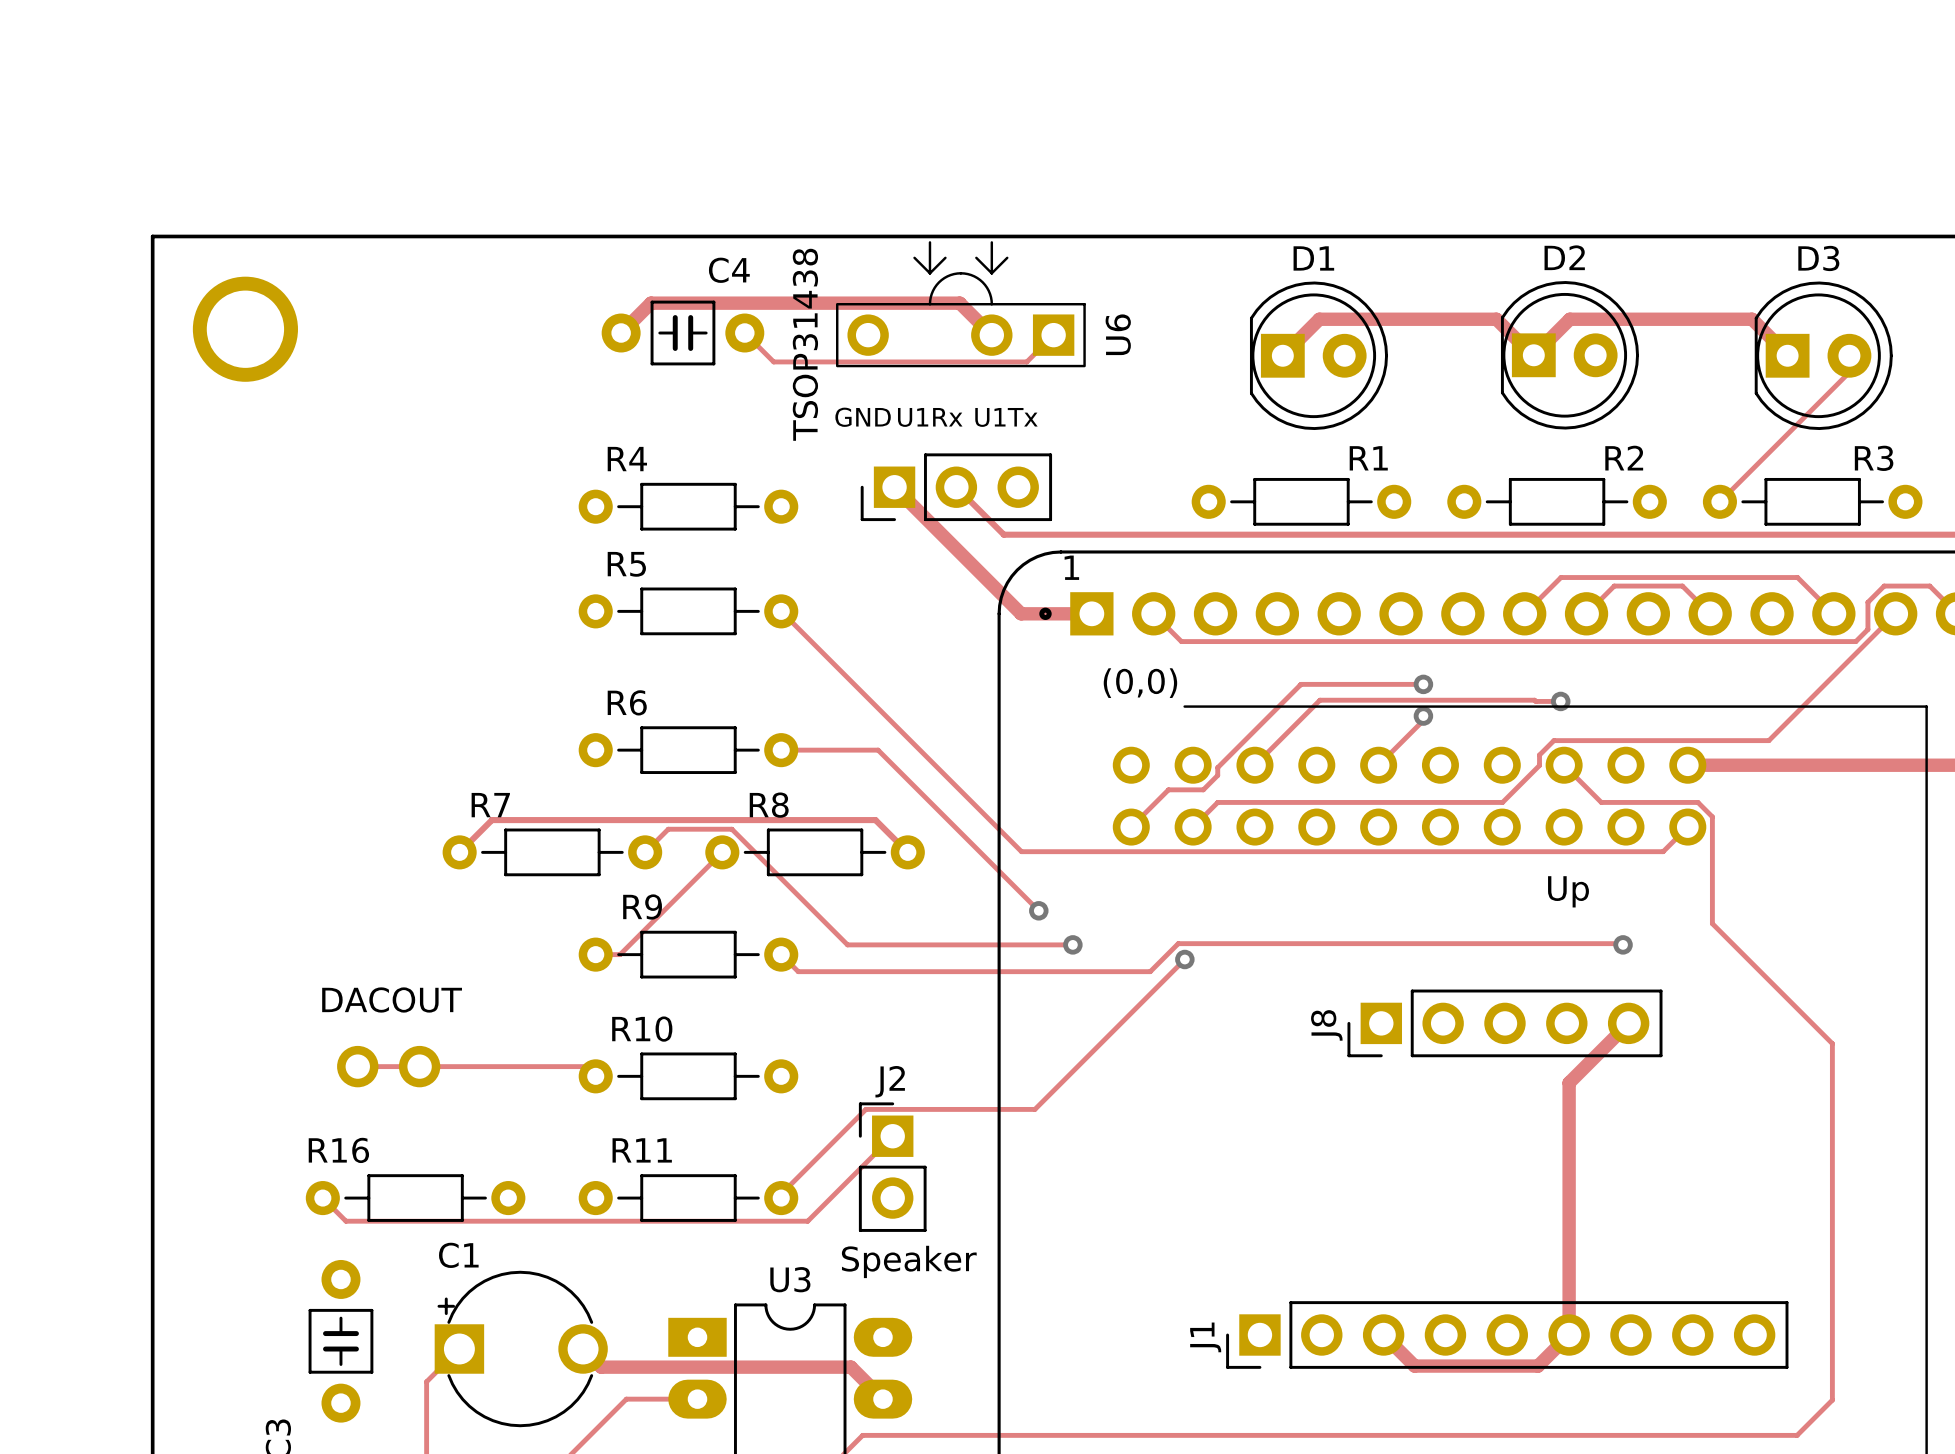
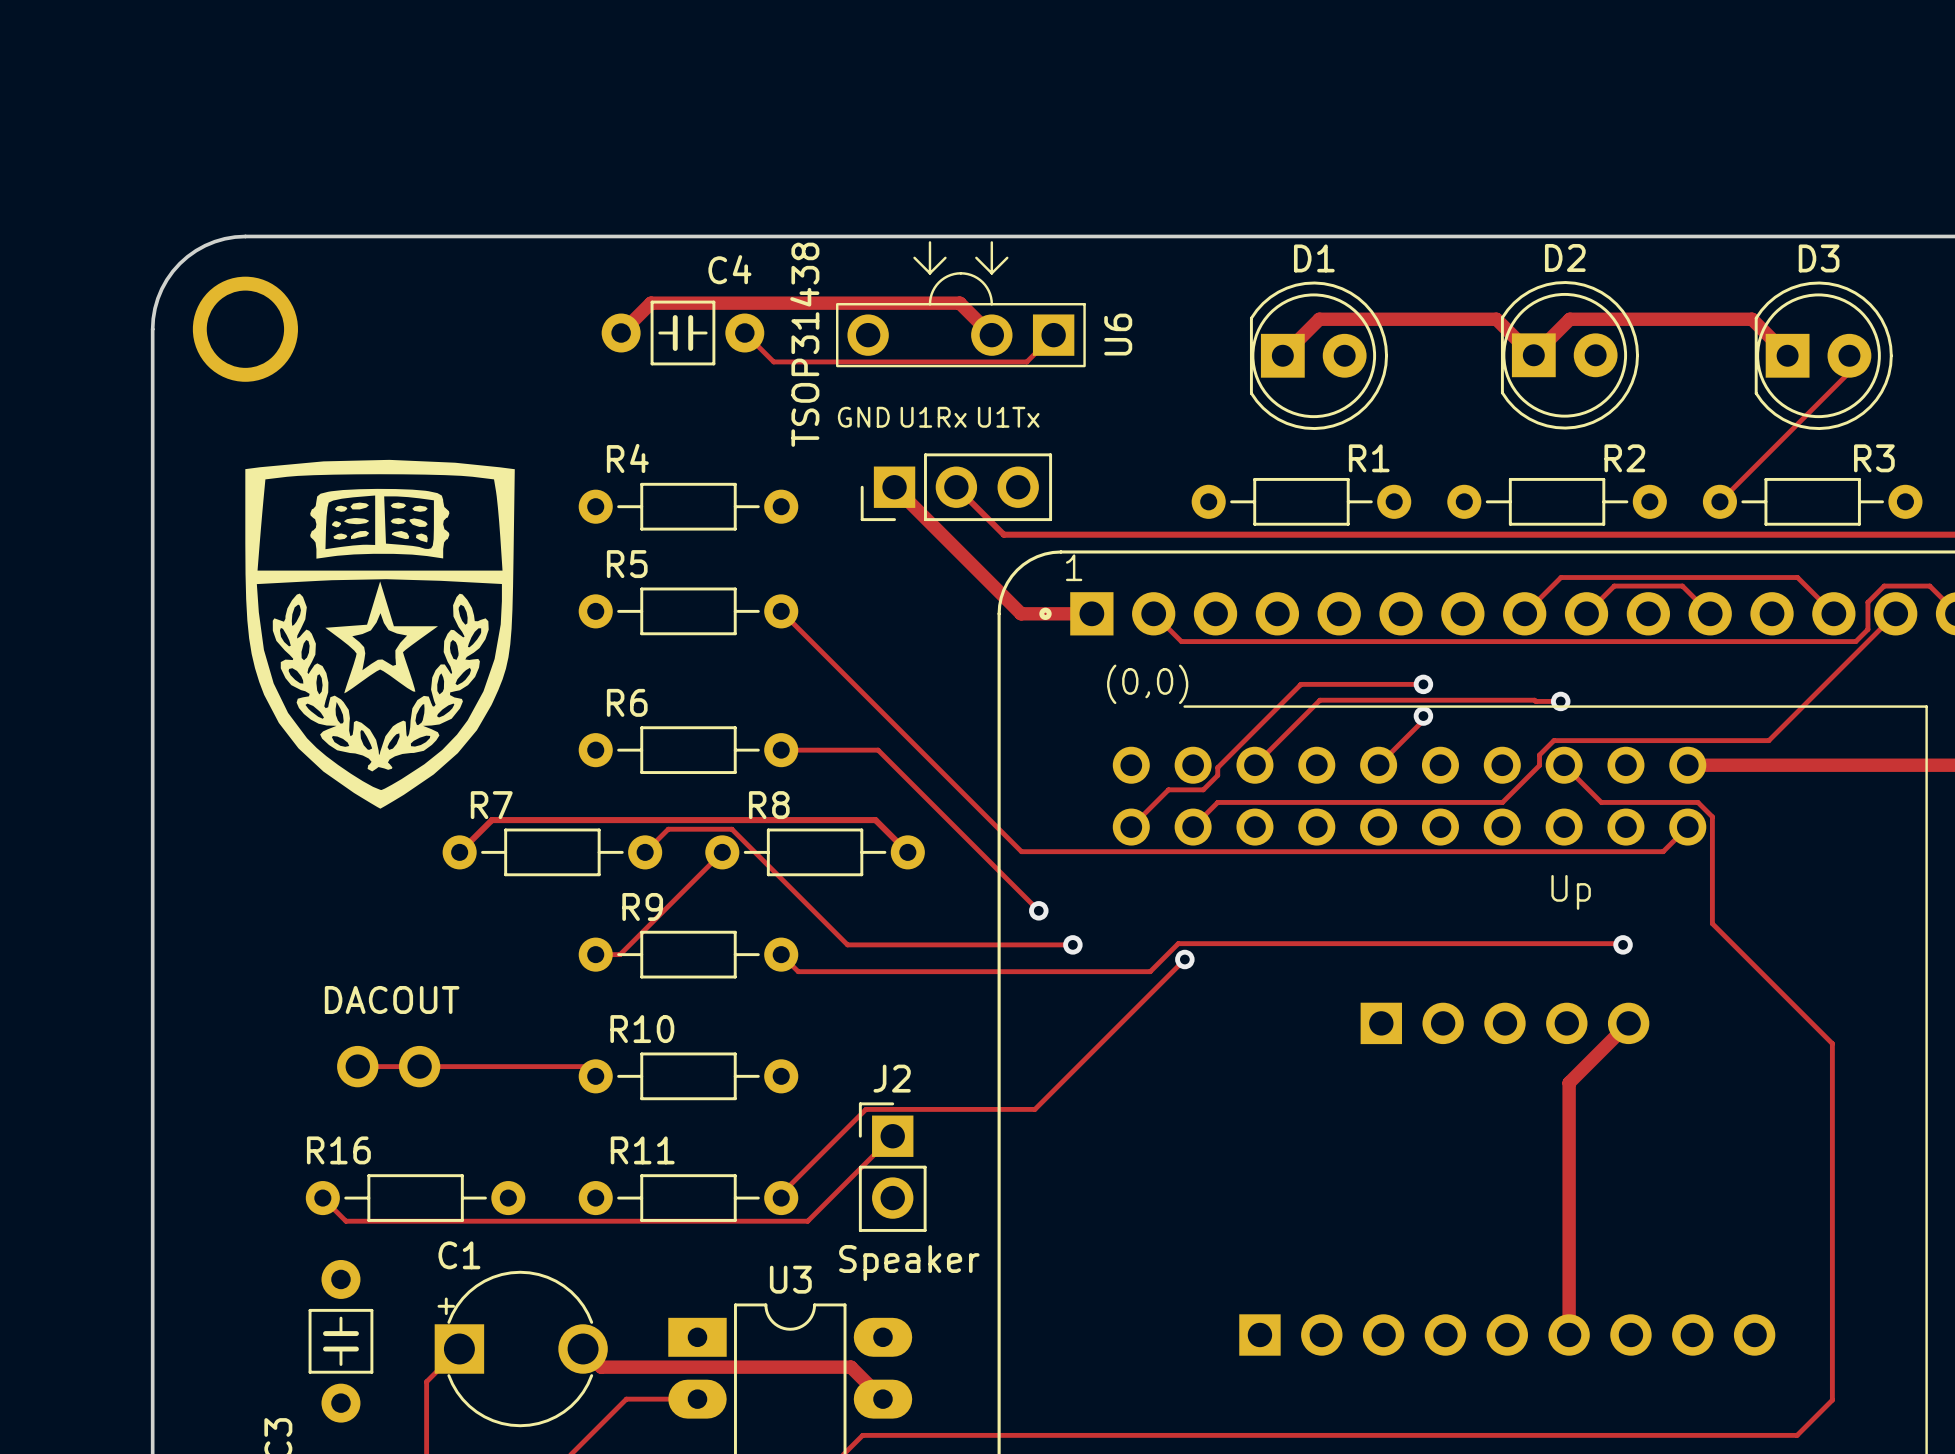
board edge: (245, 236) (152, 236) (152, 329) -> (245, 236) (224, 238) (205, 245) (179, 263) (161, 288) (155, 308) (152, 329)
drawing: none -> [245, 459, 515, 809]
J8 side: top (1504, 1023) -> bottom (1504, 1023)
track: (1383, 1335) (1414, 1366) (1538, 1366) (1569, 1335) -> none
J1 side: top (1507, 1335) -> bottom (1507, 1335)

